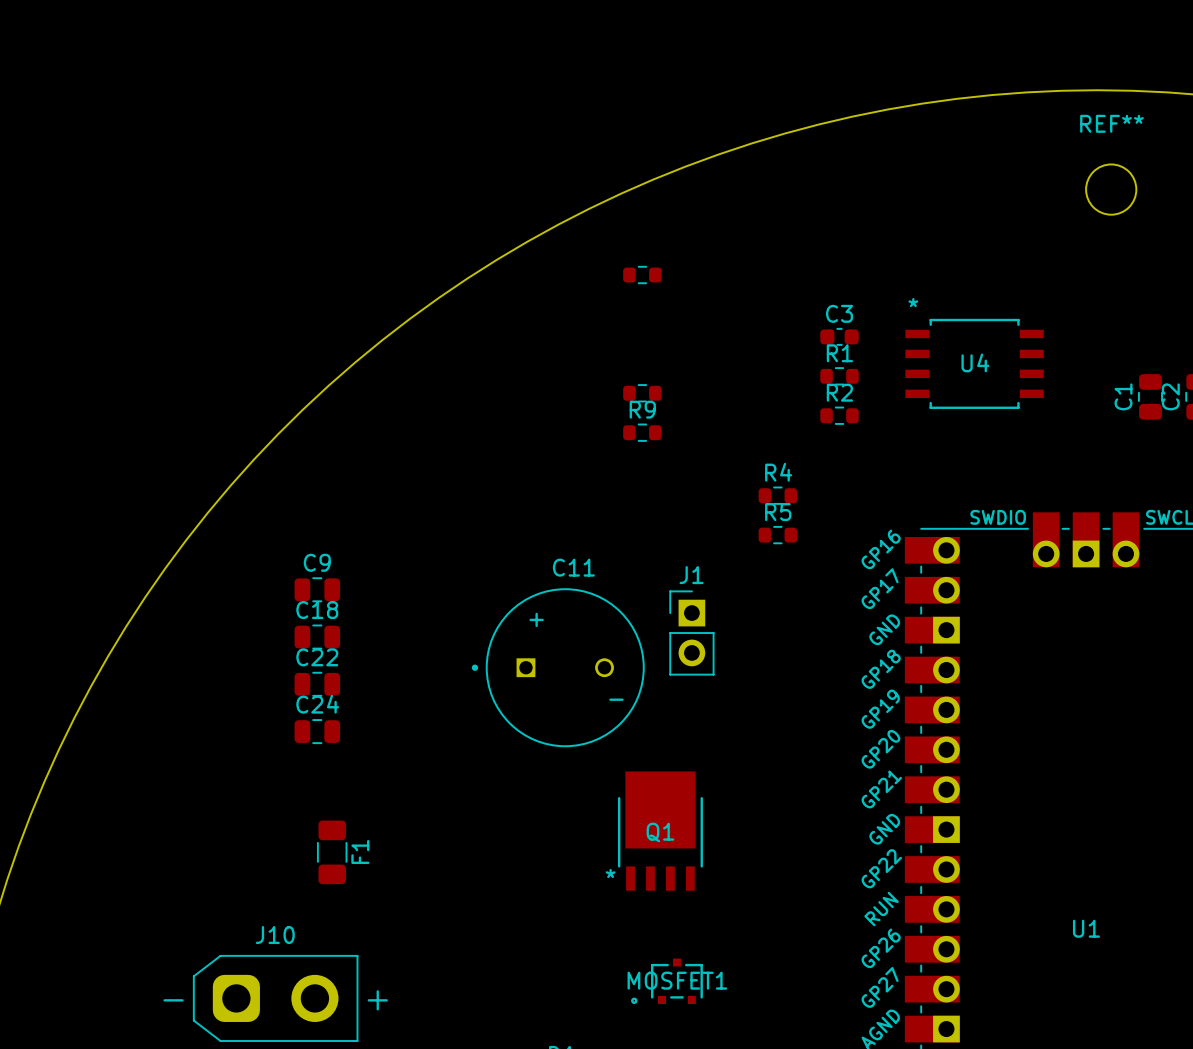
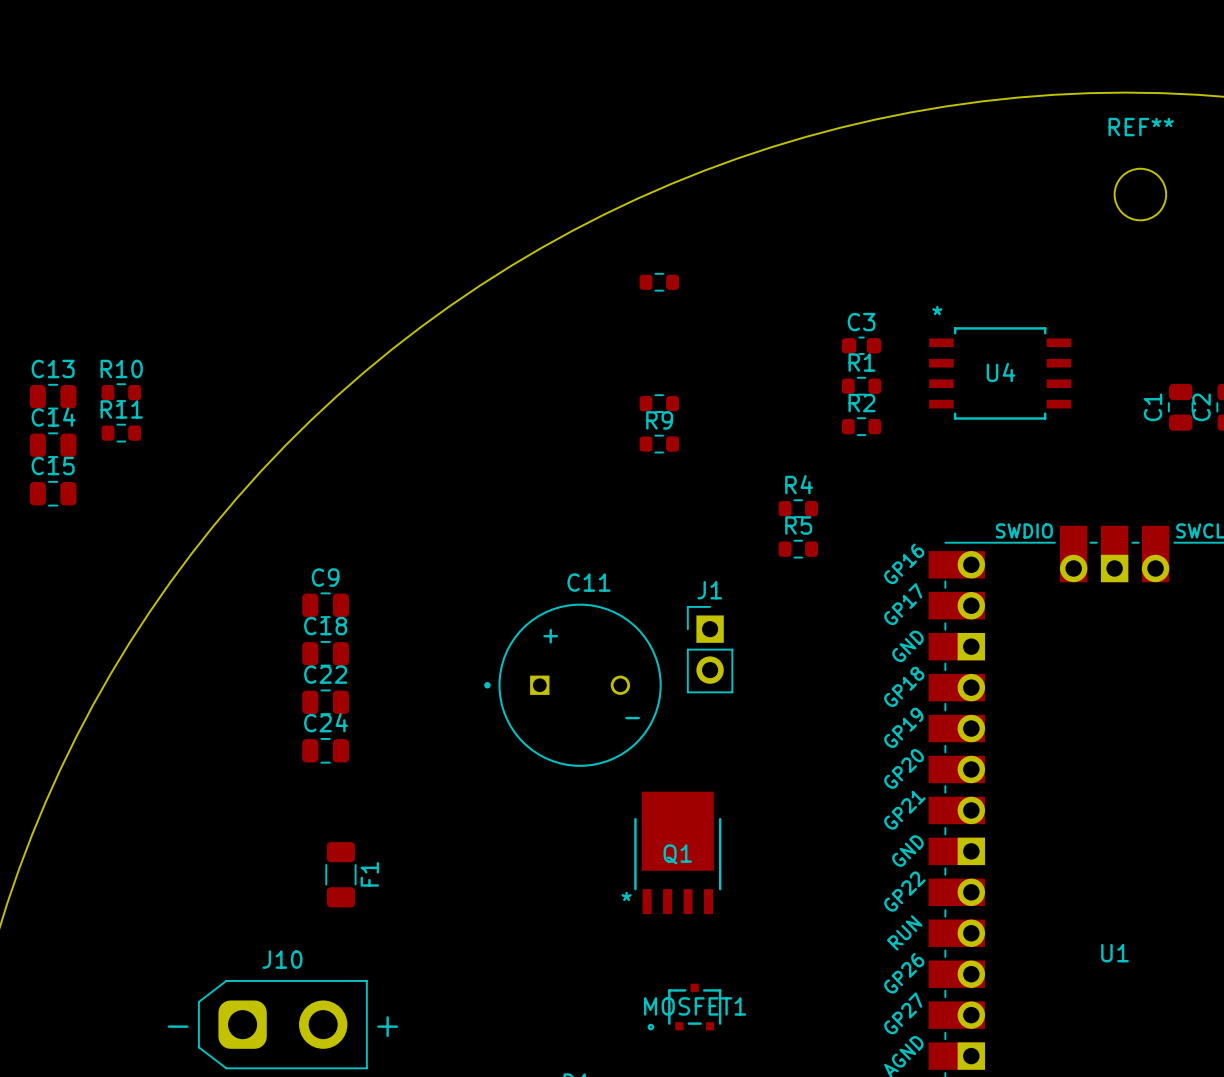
R10: none -> (121, 392)
C13: none -> (53, 396)
R11: none -> (121, 433)
C14: none -> (53, 445)
C15: none -> (53, 493)

